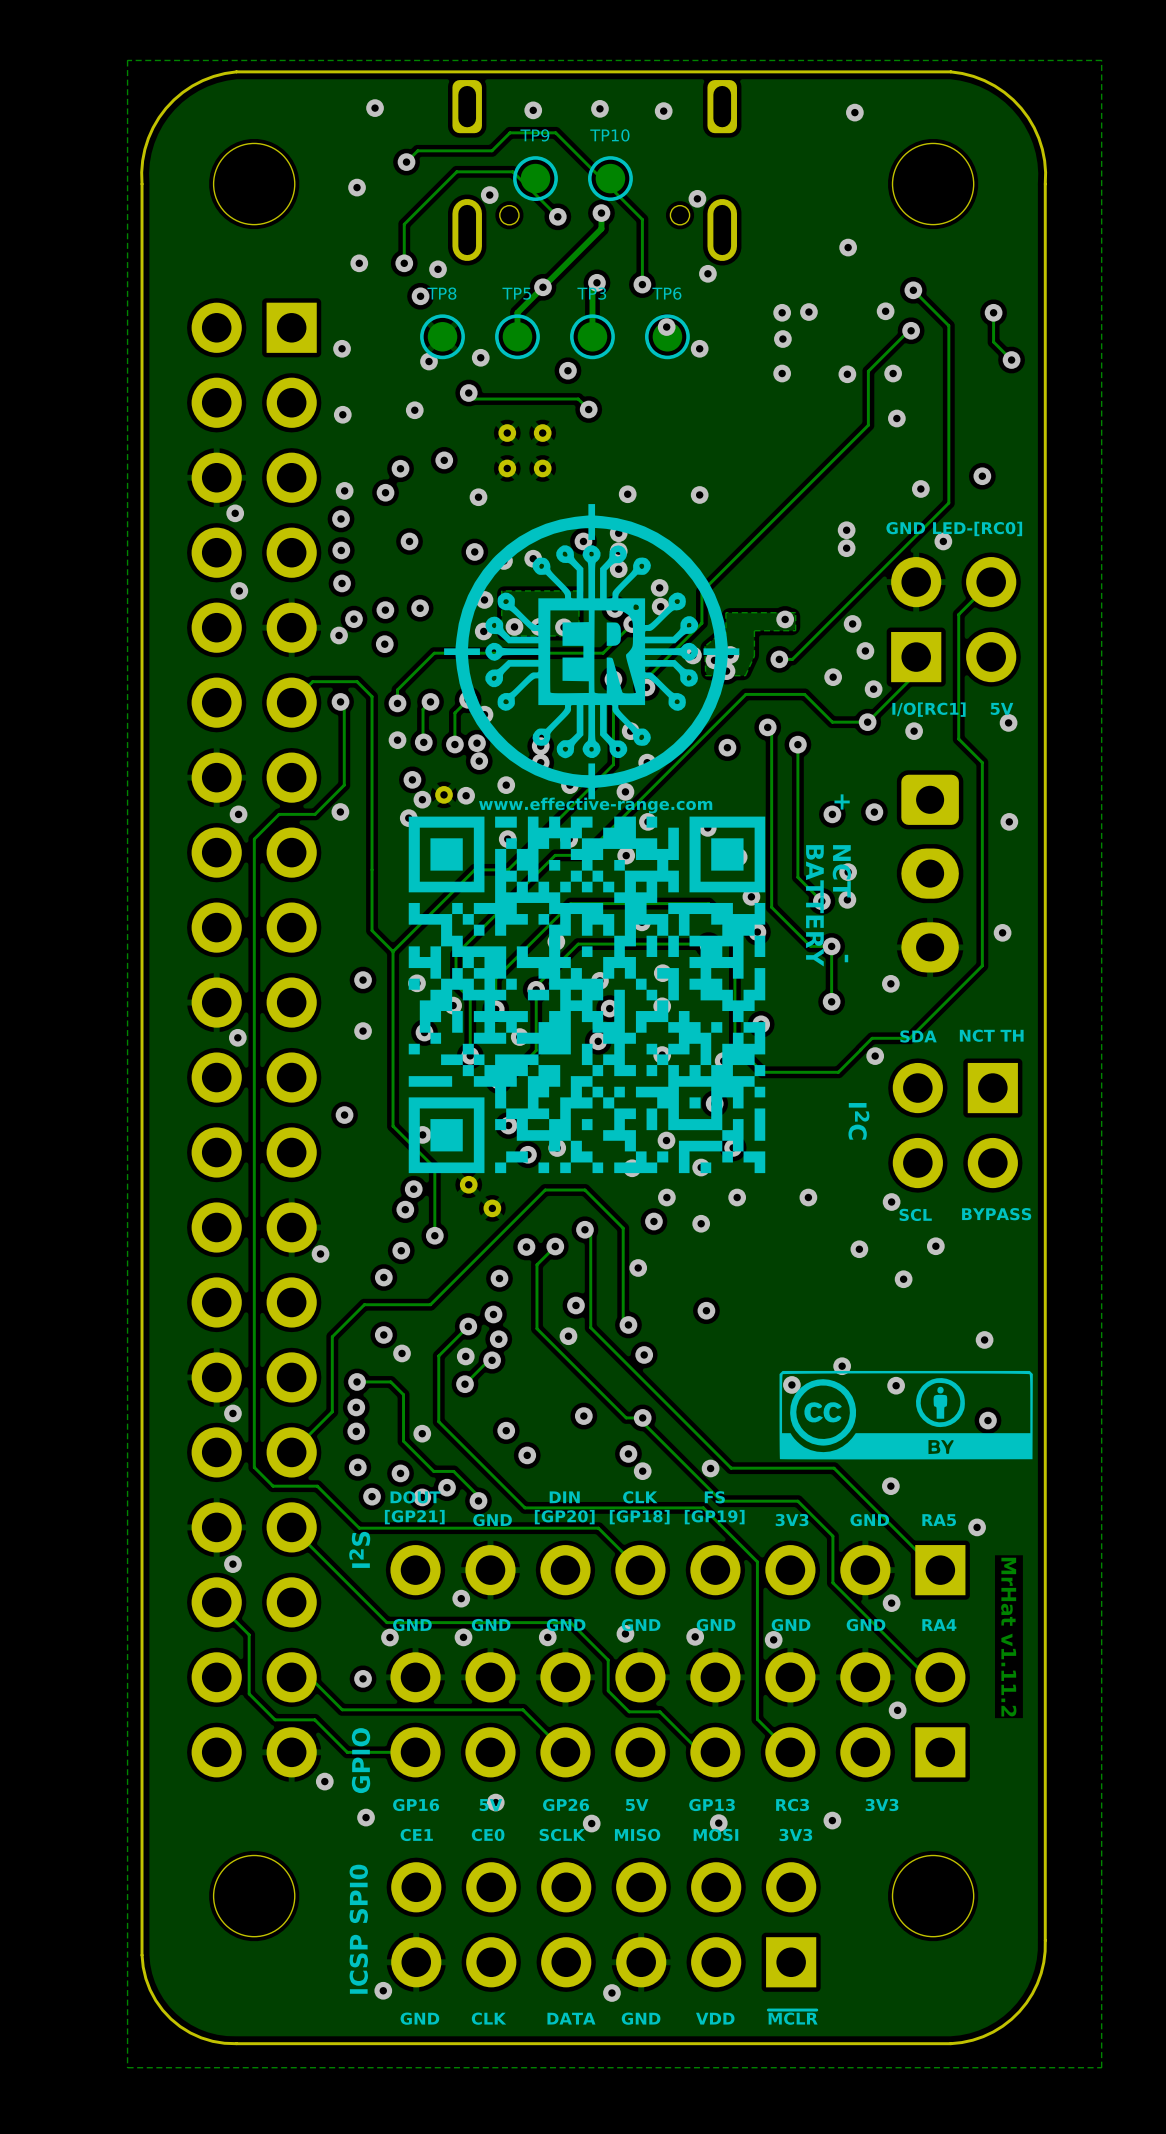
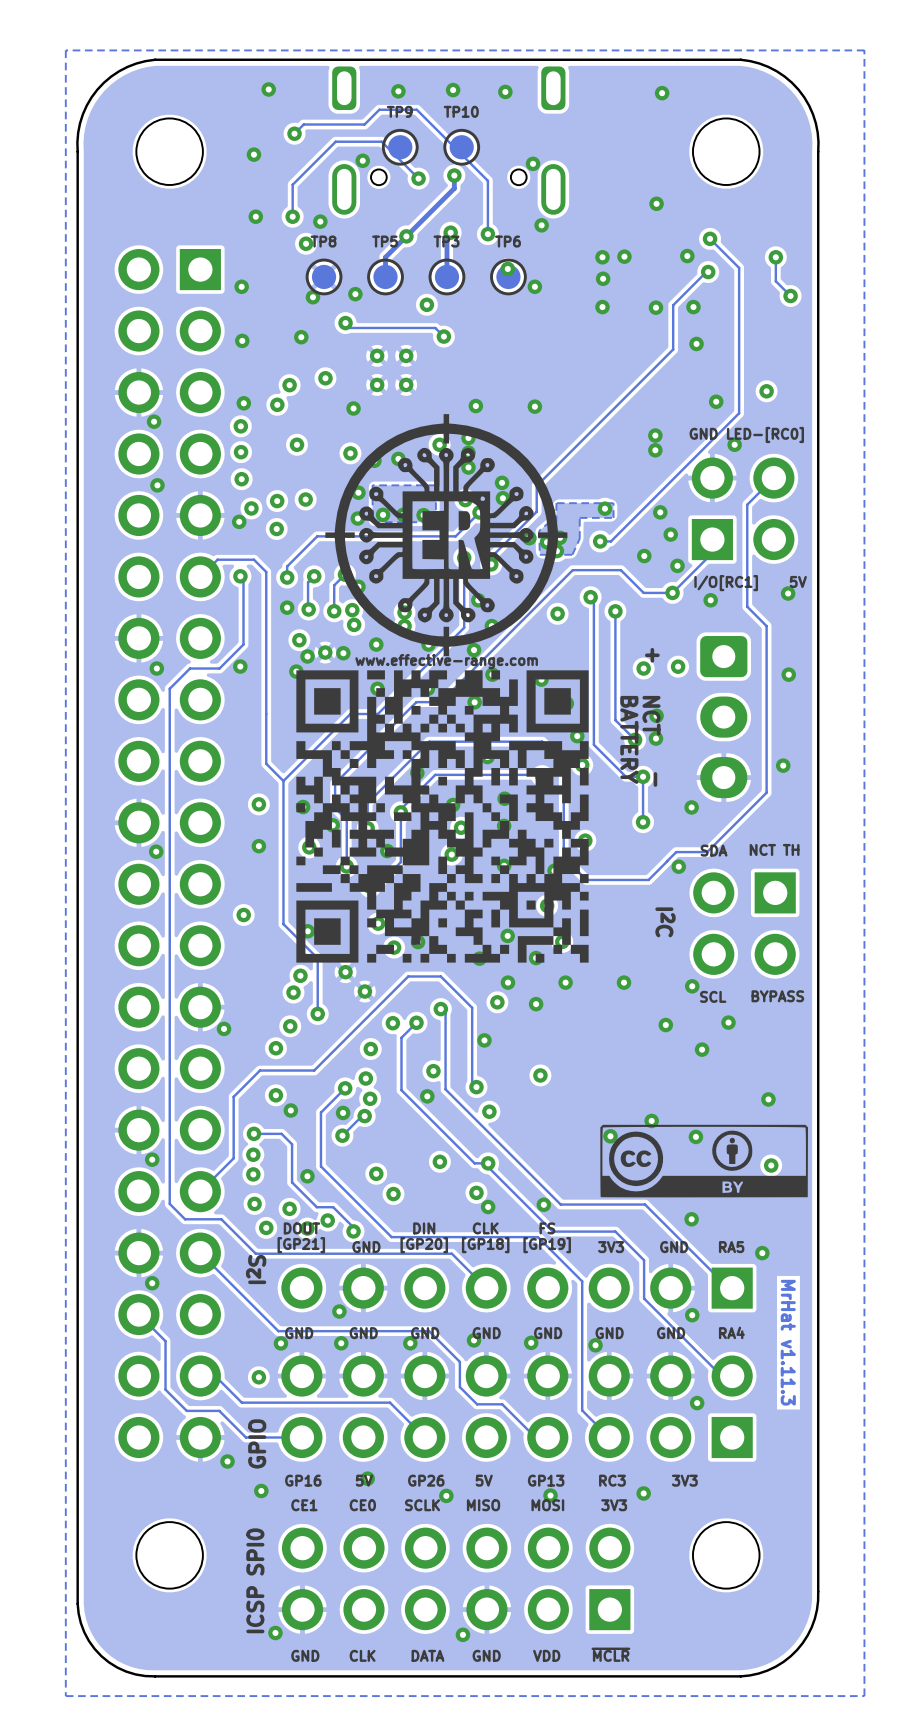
text: MrHat v1.11.2 (1008, 1637) -> MrHat v1.11.3 (788, 1342)

